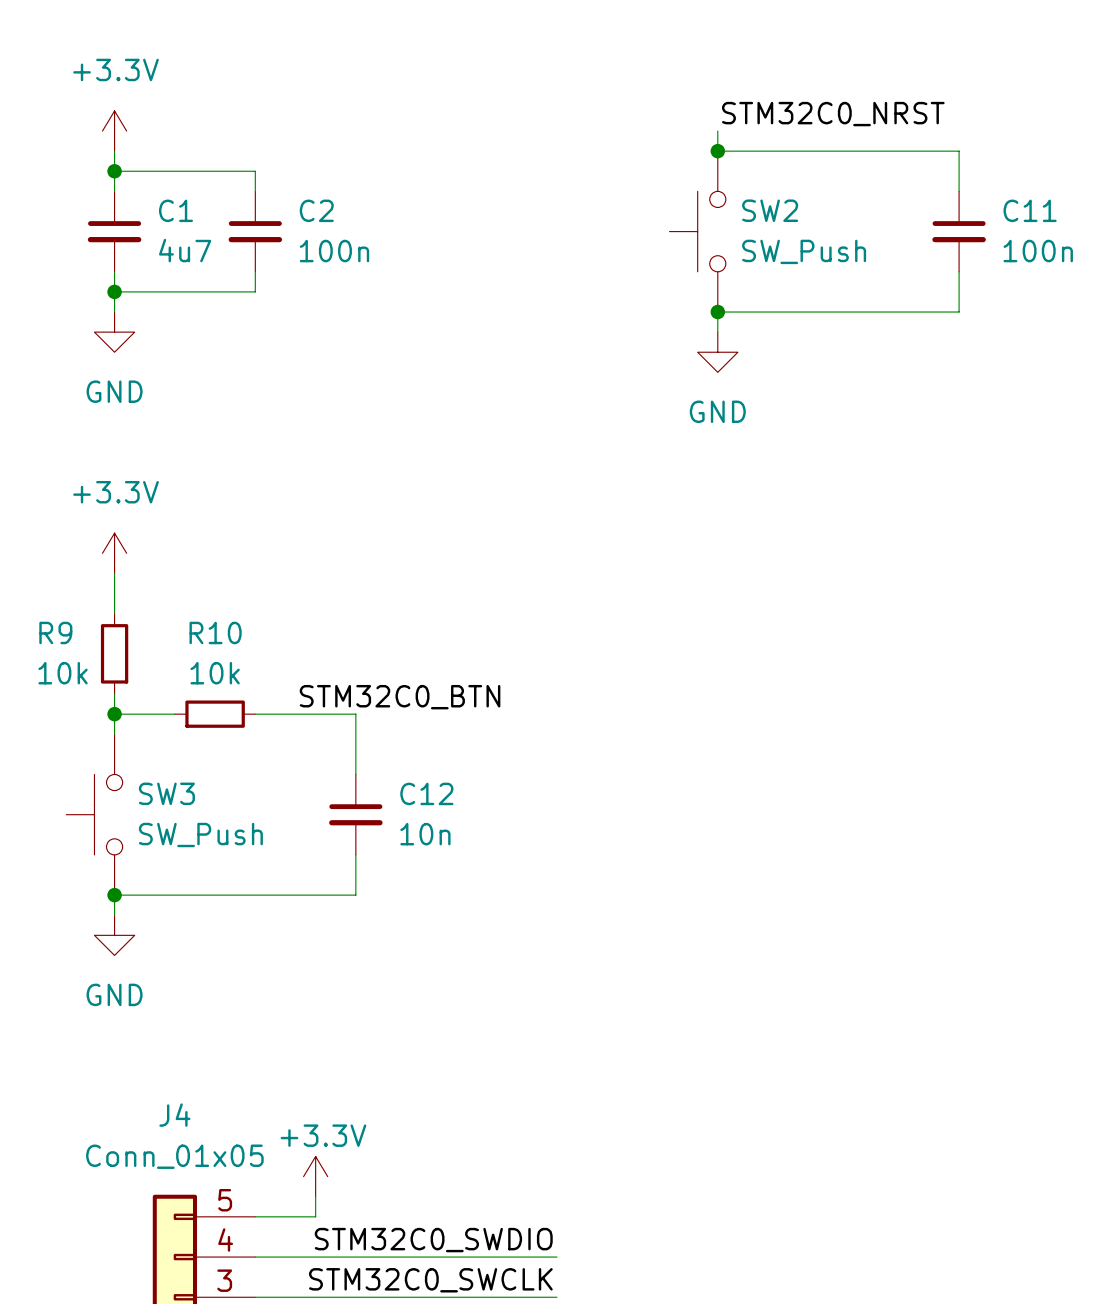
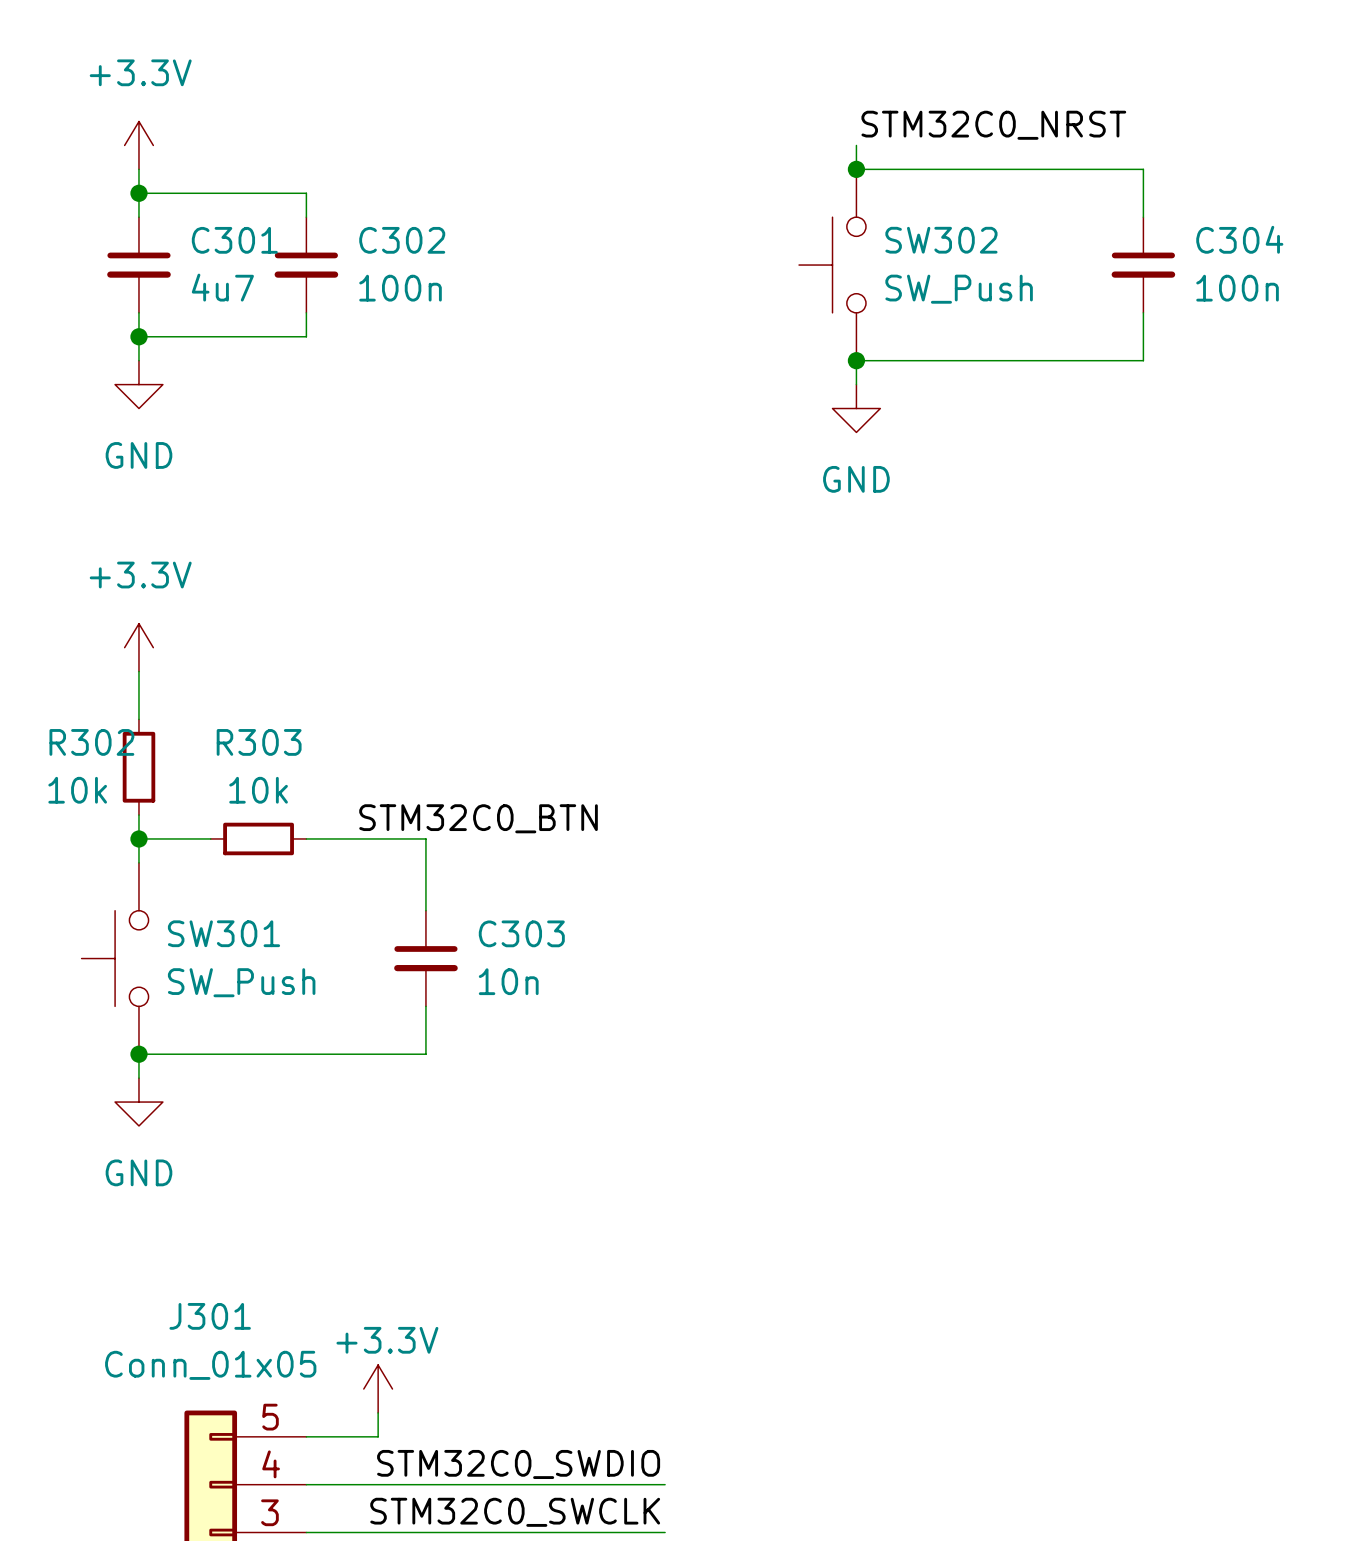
C1 name: C1 (176, 210) -> C301 (234, 240)
C2 name: C2 (316, 210) -> C302 (402, 240)
SW2 name: SW2 (770, 210) -> SW302 (941, 240)
C11 name: C11 (1030, 210) -> C304 (1239, 239)
R9 name: R9 (55, 632) -> R302 (91, 742)
R10 name: R10 (215, 632) -> R303 (259, 742)
SW3 name: SW3 (166, 793) -> SW301 (224, 933)
C12 name: C12 (426, 793) -> C303 (521, 933)
J4 name: J4 (174, 1115) -> J301 (210, 1316)

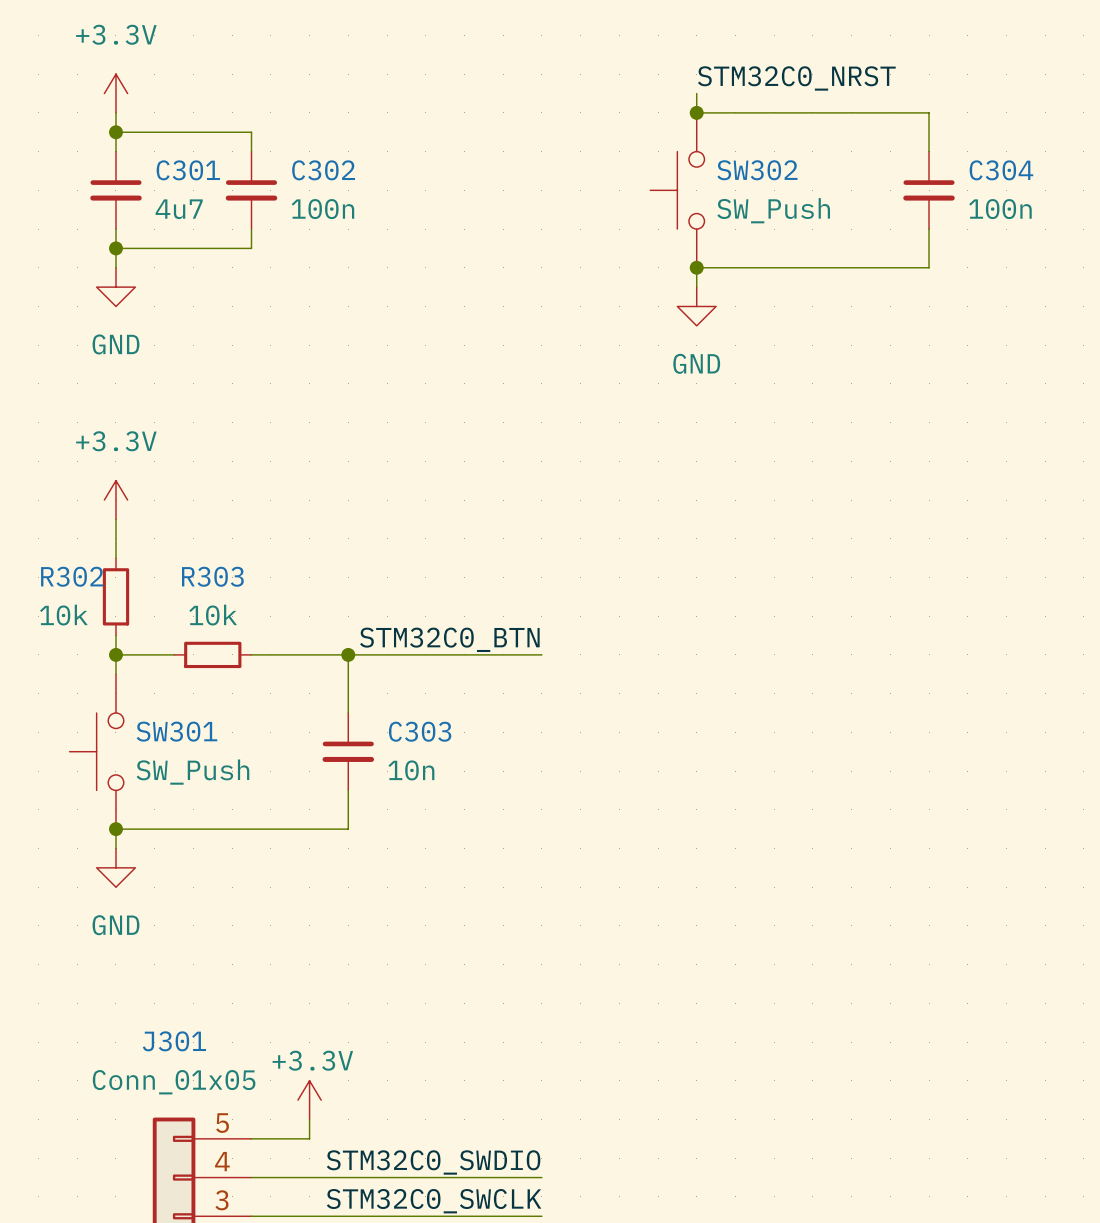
label position: STM32C0_BTN (478, 818) -> STM32C0_BTN (449, 639)
wire: none -> (348, 654) (541, 654)
junction: none -> (348, 654)

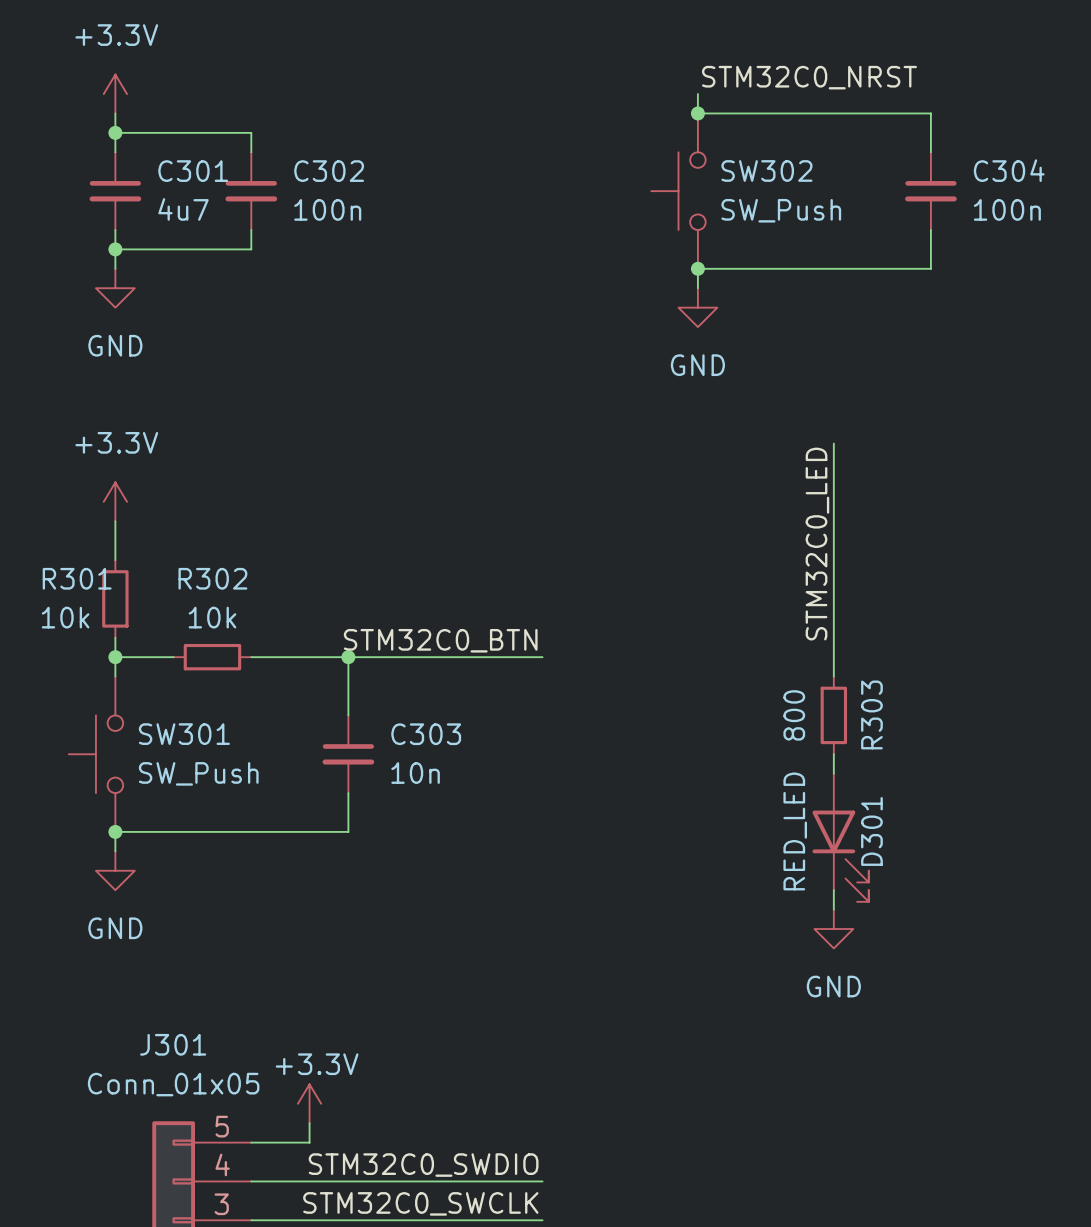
wire: none -> (833, 443) (833, 676)
label: none -> STM32C0_LED (817, 544)
R302 name: R302 (72, 576) -> R301 (77, 578)
R303 name: R303 (212, 576) -> R302 (212, 578)
R303: none -> 800 (833, 715)
wire: none -> (833, 754) (833, 773)
D301: none -> RED_LED (840, 837)
wire: none -> (833, 890) (833, 909)
power symbol: none -> GND (833, 929)

